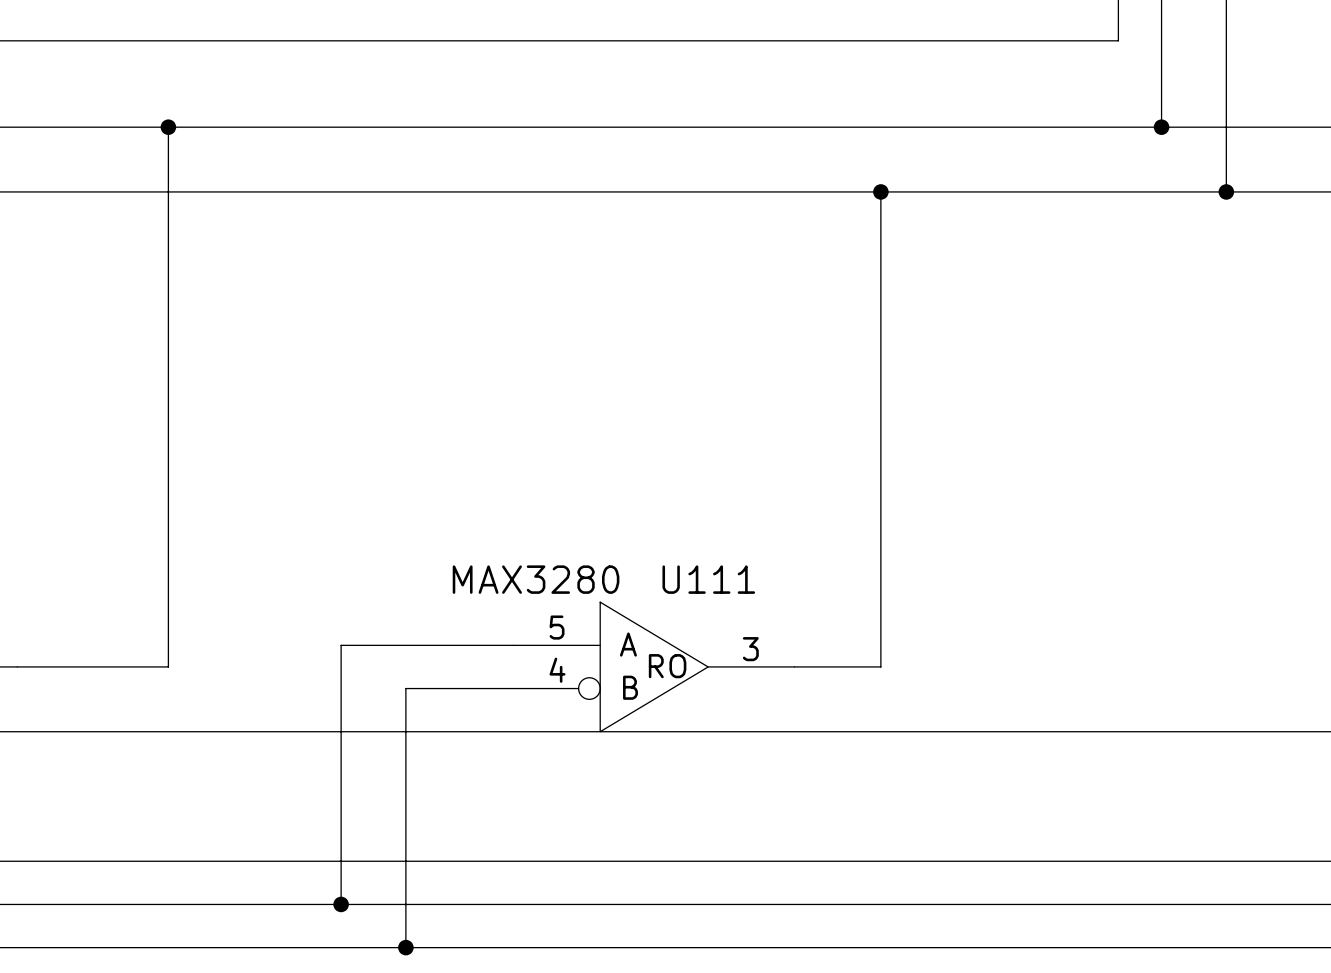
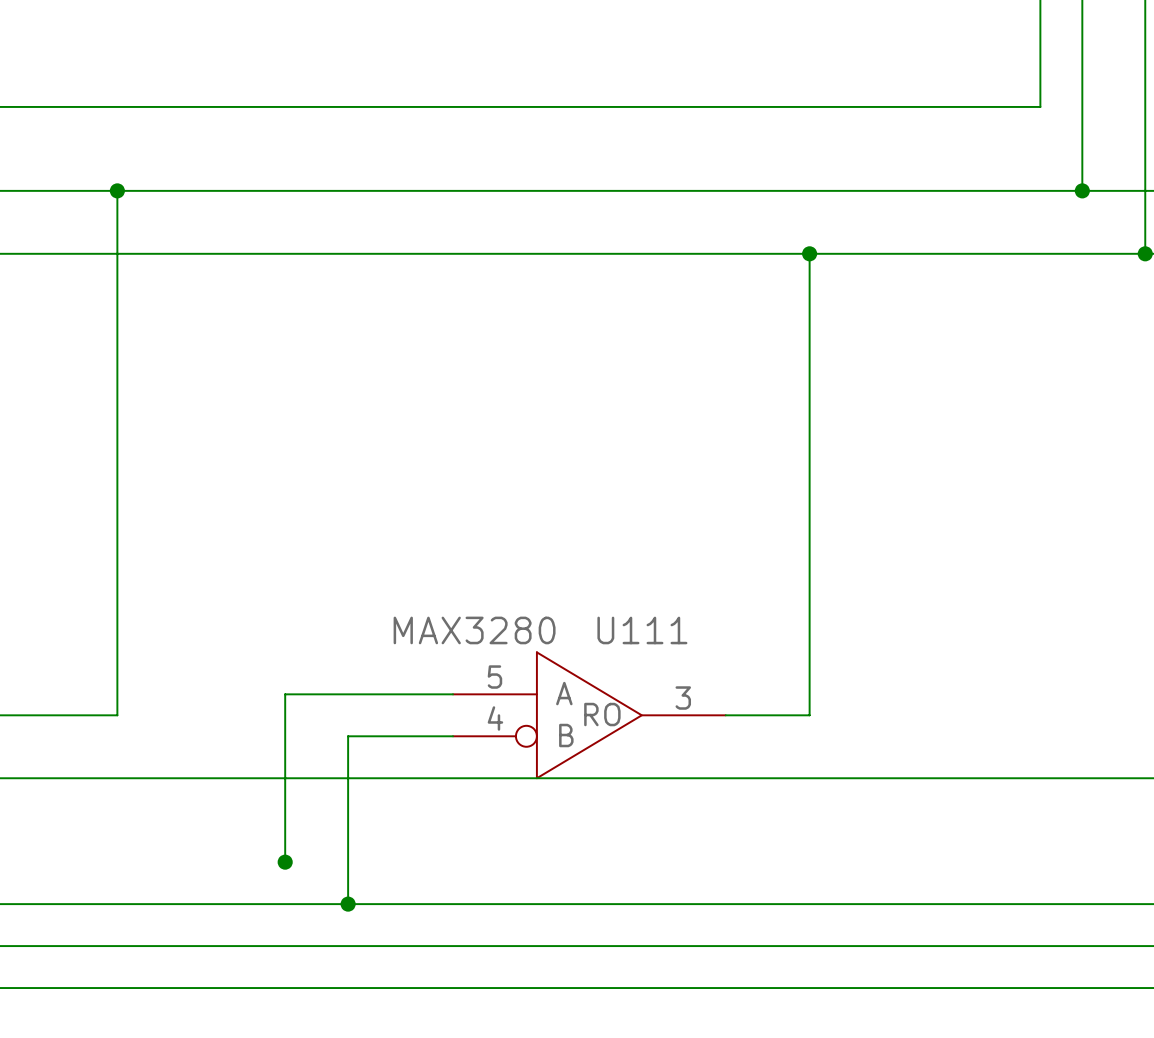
wire: (341, 818) (341, 904) -> none
junction: none -> (285, 862)
wire: (405, 861) (405, 947) -> none
junction: none -> (348, 904)
junction: (341, 904) -> none
junction: (405, 947) -> none

